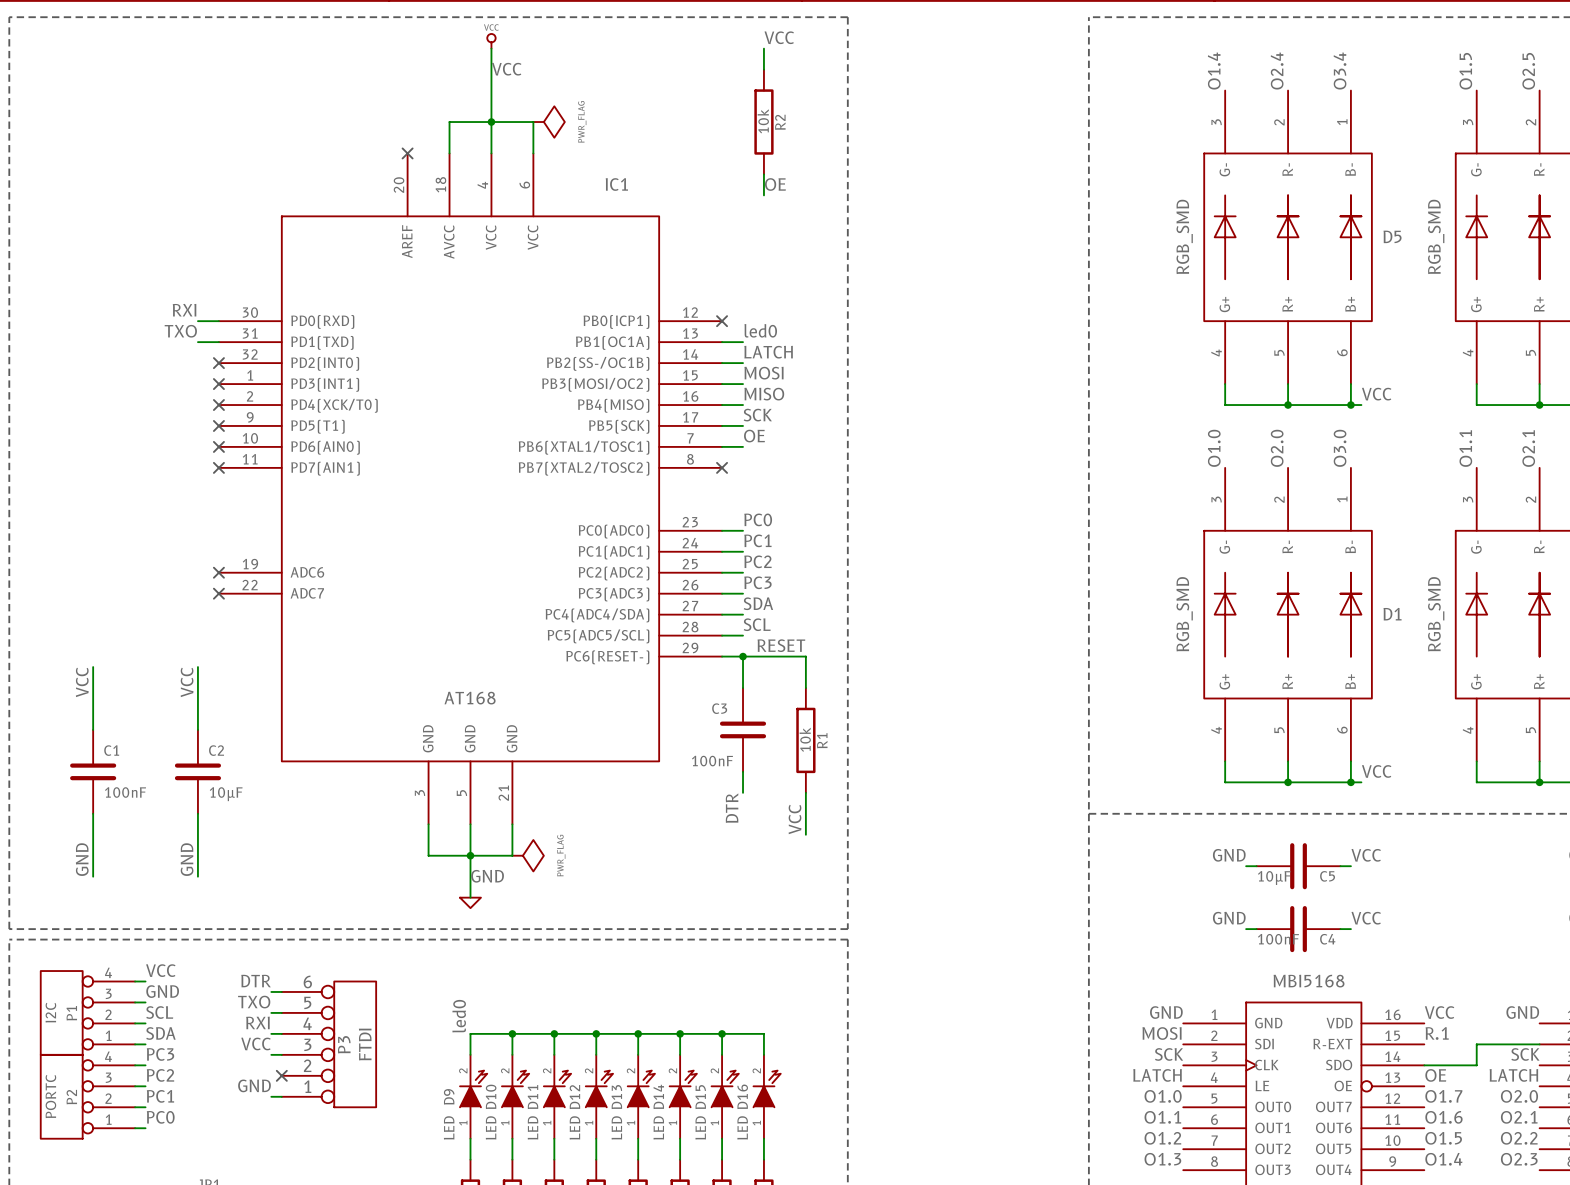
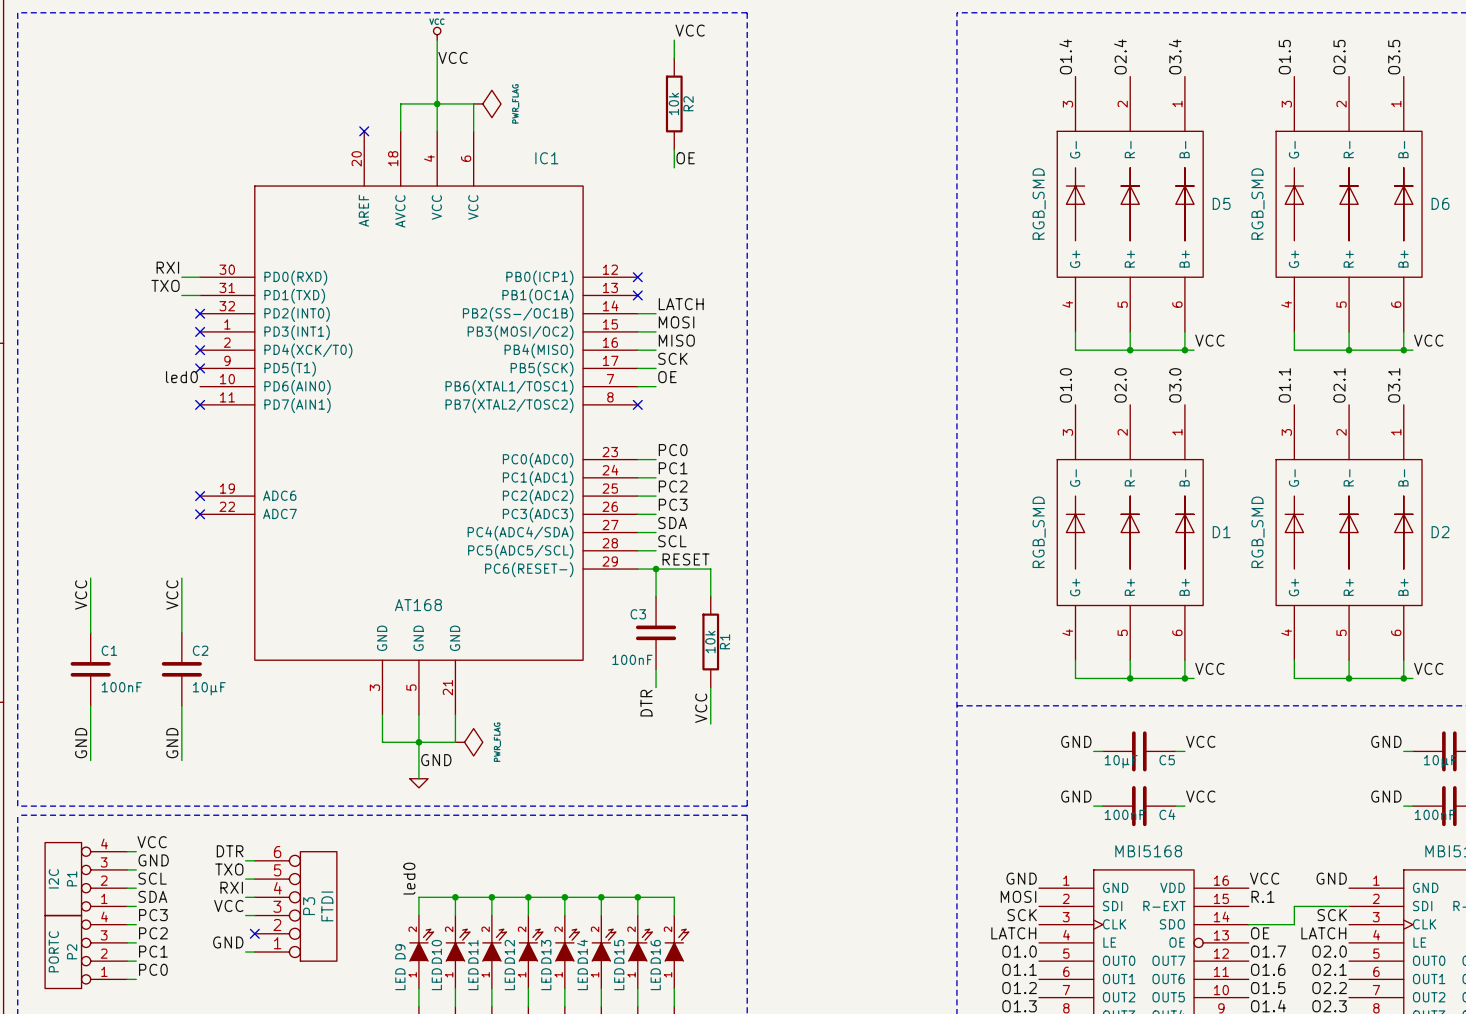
label: led0 (760, 330) -> none
wire: (722, 342) (743, 342) -> none
no-connect mark: none -> (637, 295)
label: none -> led0 (181, 377)
no-connect mark: (218, 446) -> none

